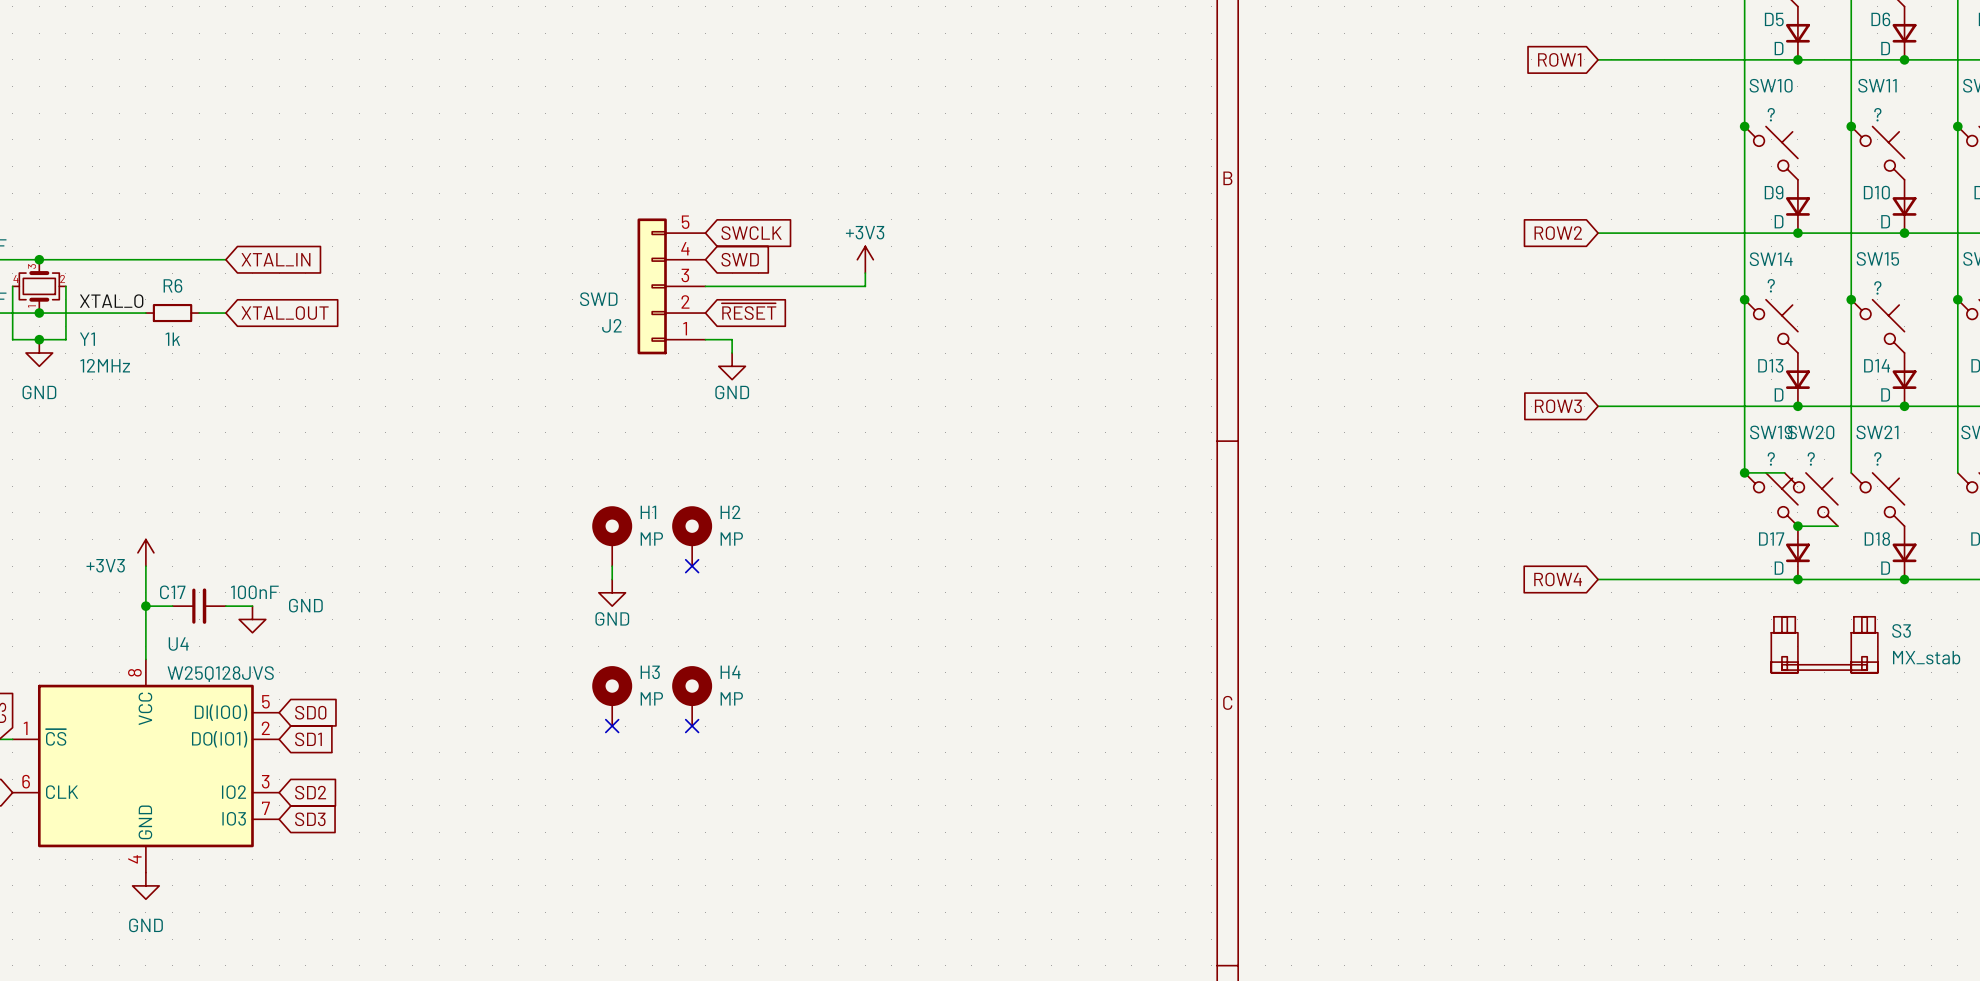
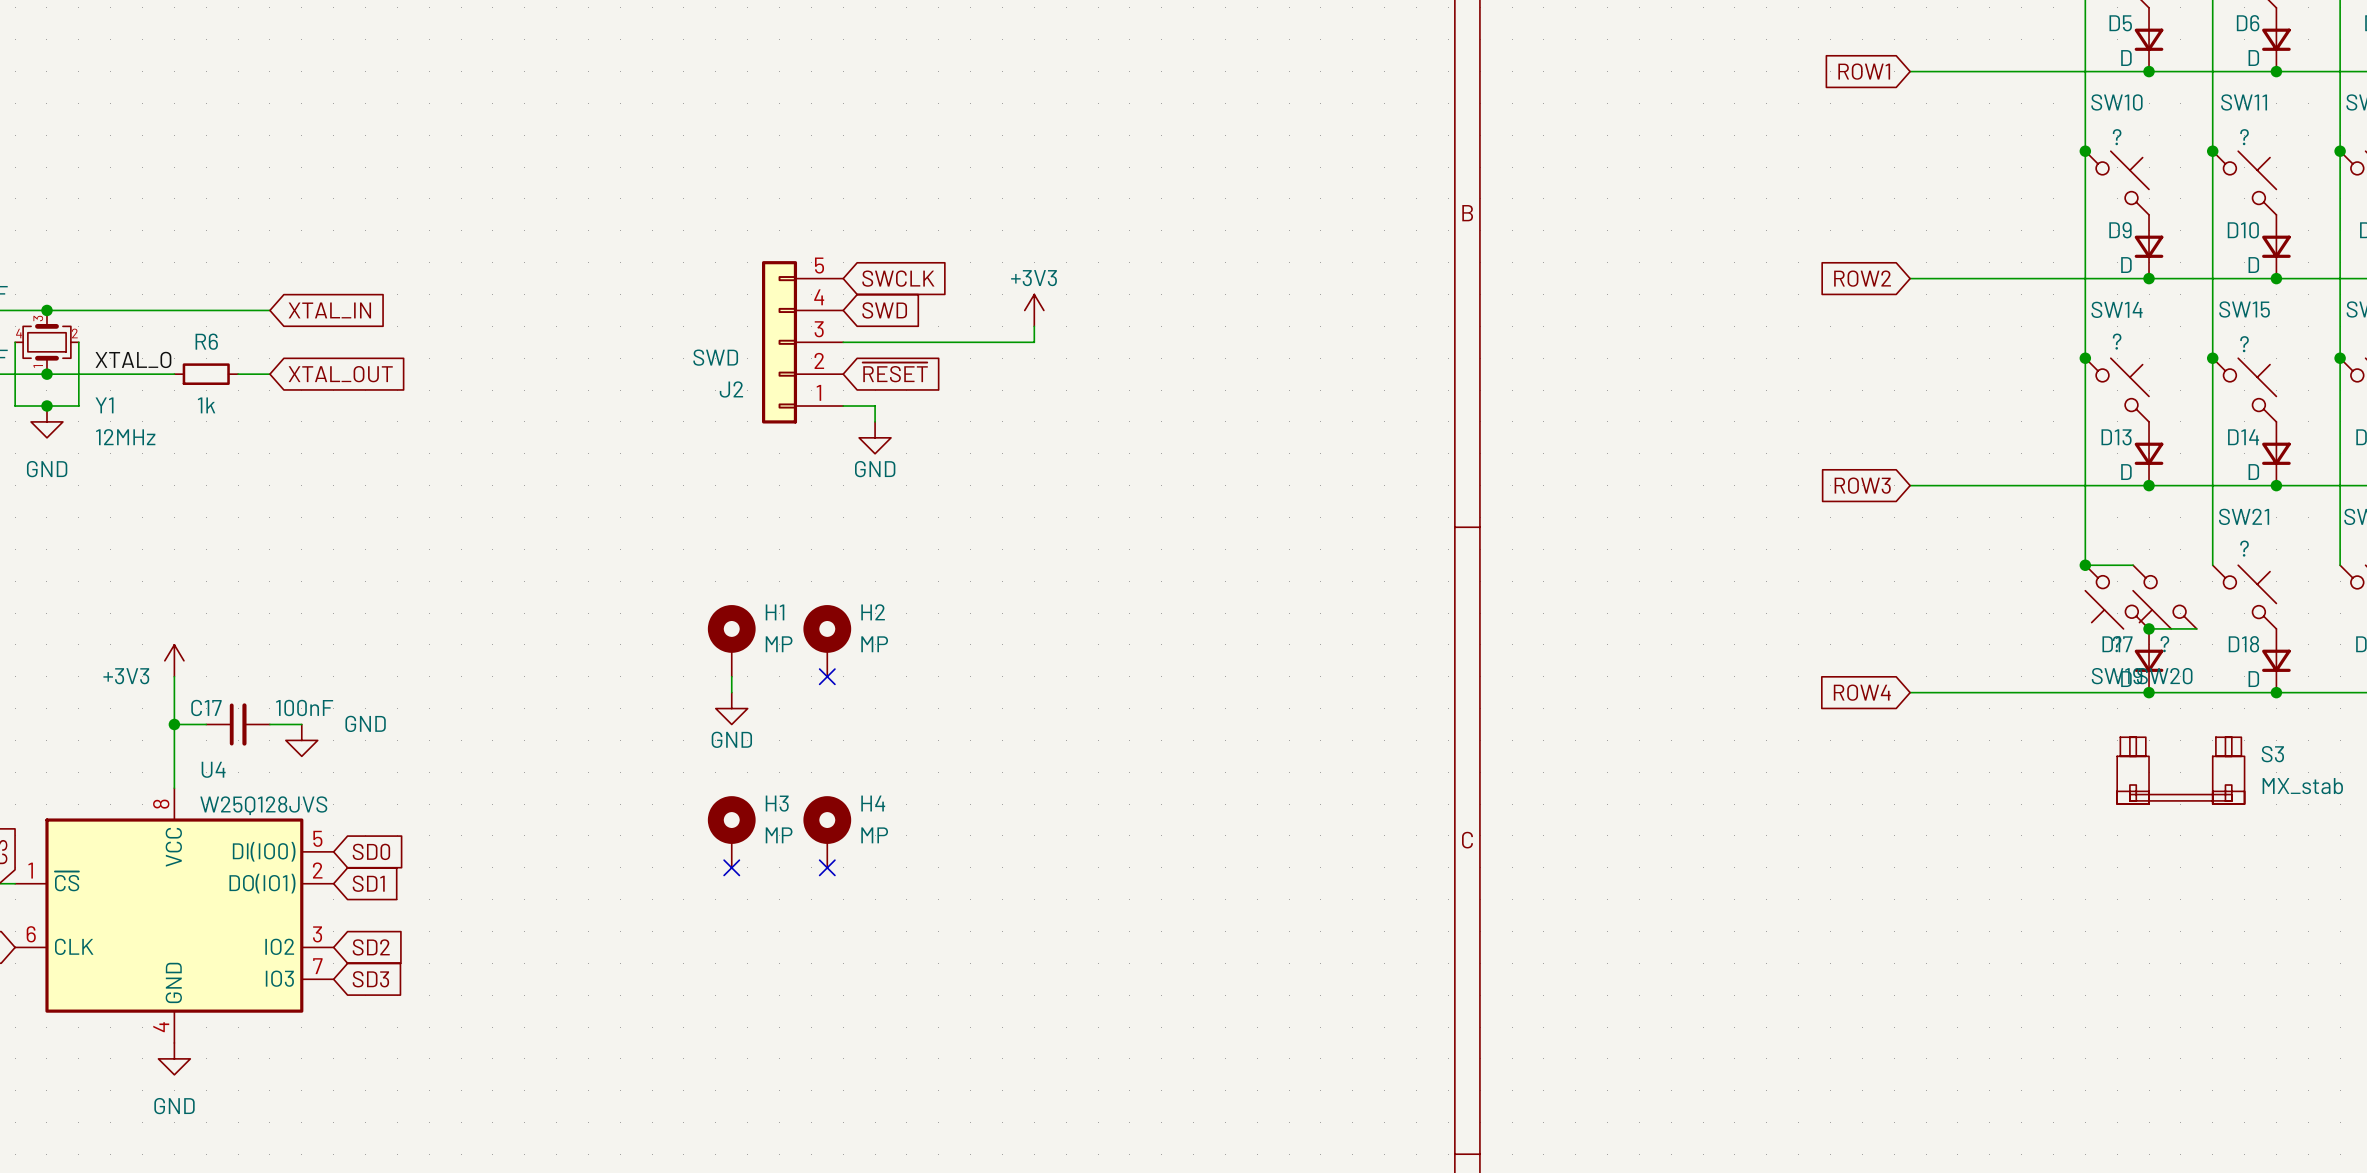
SW19 rotation: 0° (1771, 499) -> 180° (2117, 597)
SW20 rotation: 0° (1811, 499) -> 180° (2164, 597)

